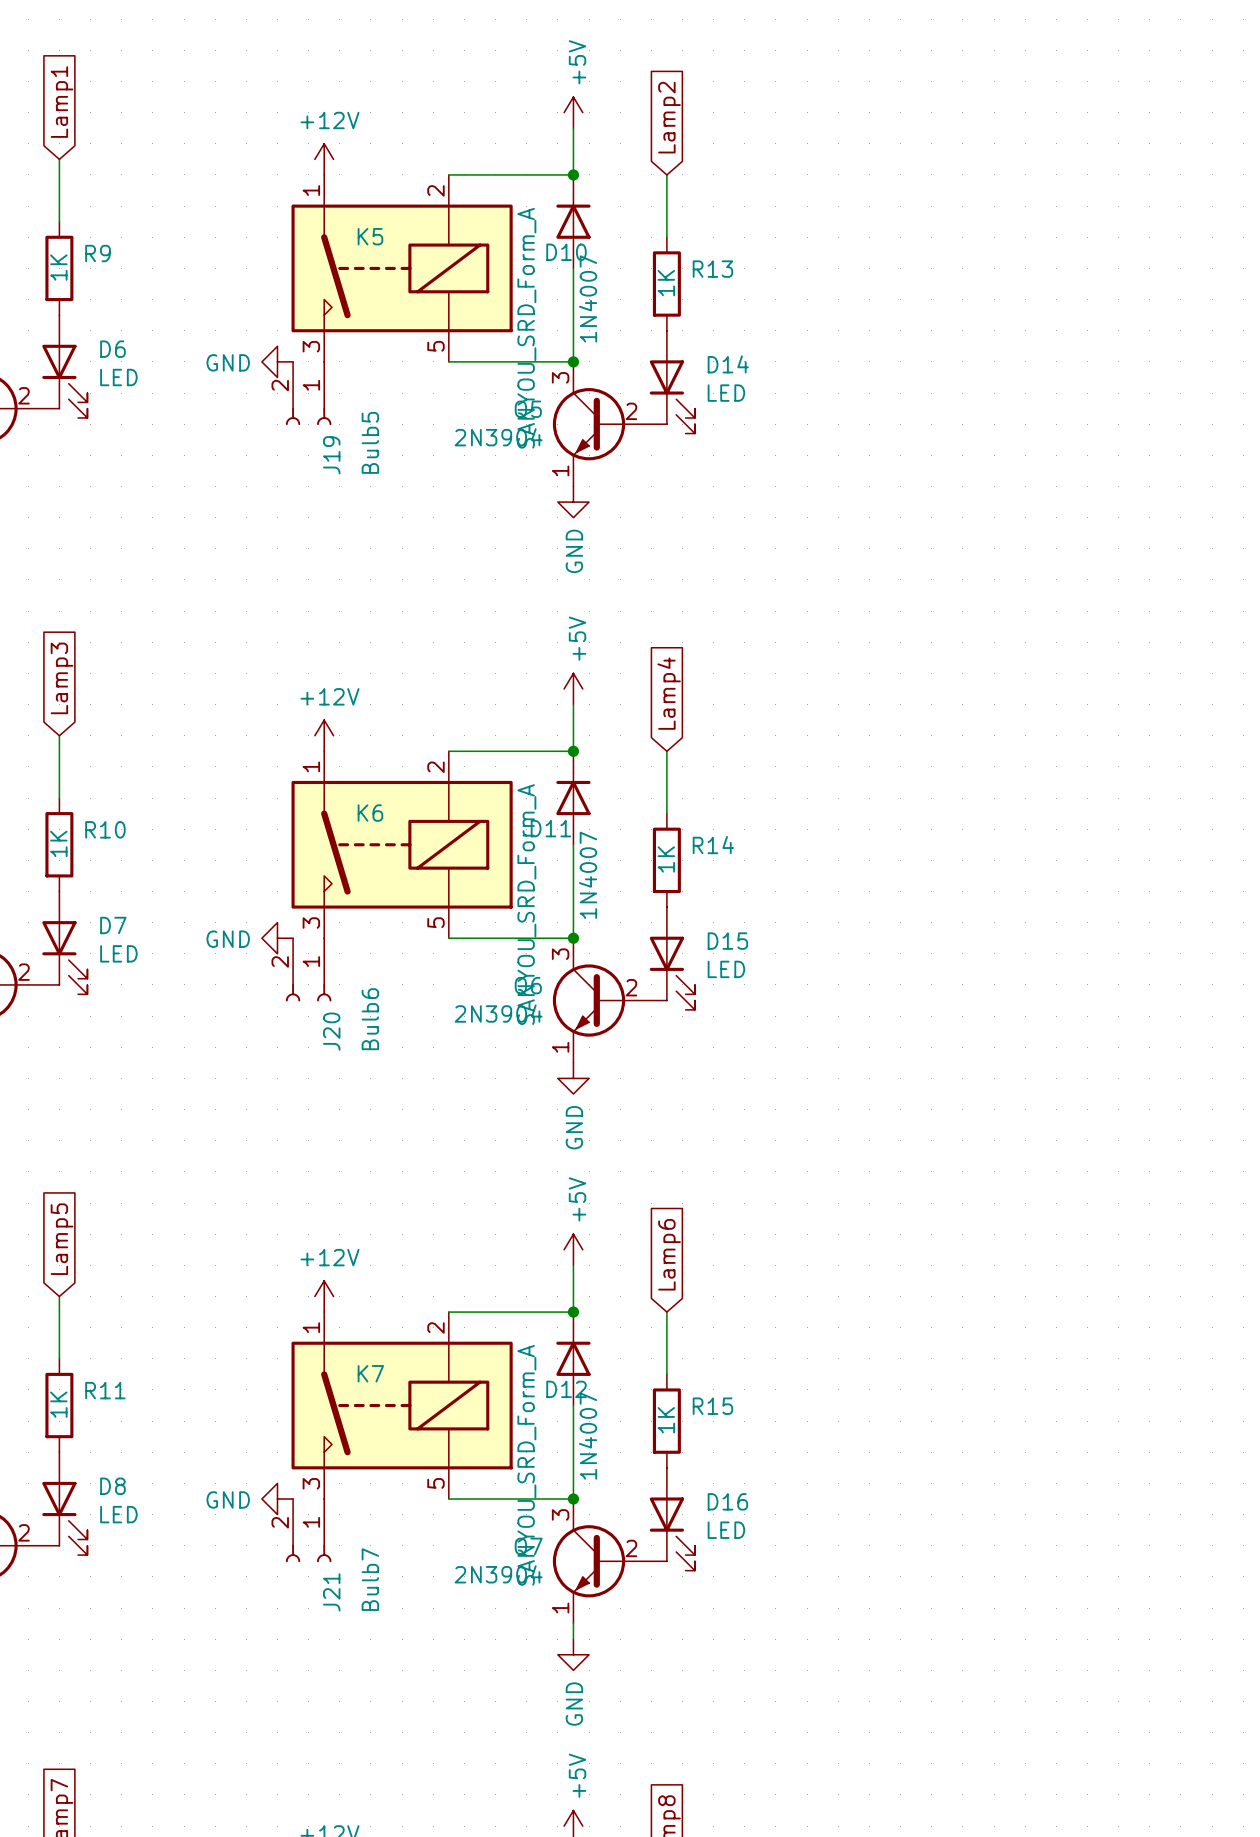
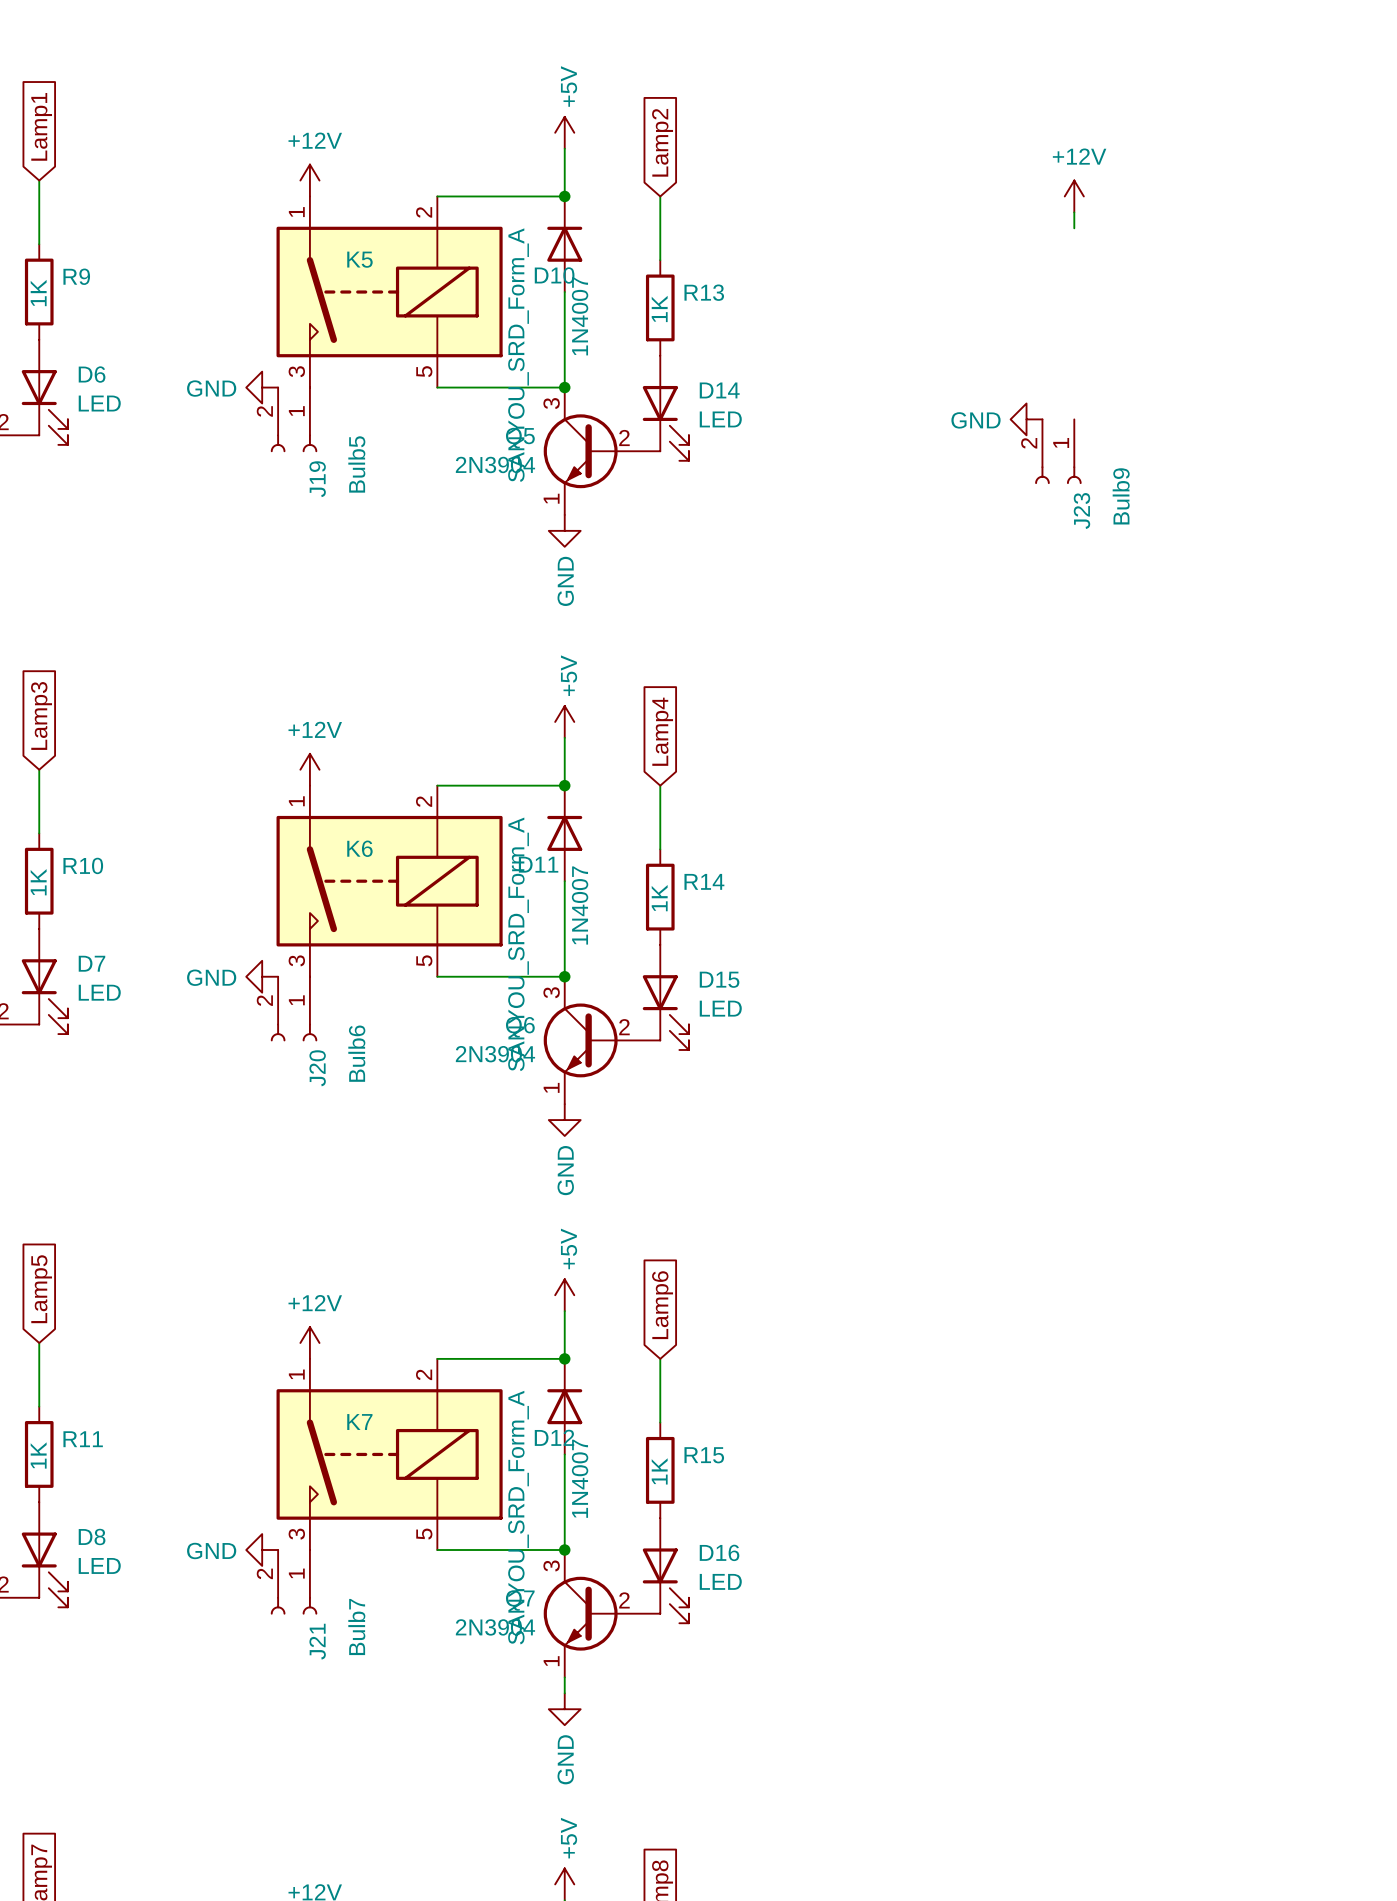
power symbol: none -> +12V (1074, 196)
wire: none -> (1074, 212) (1074, 228)
power symbol: none -> GND (1026, 419)
J23: none -> Bulb9 (1058, 451)

